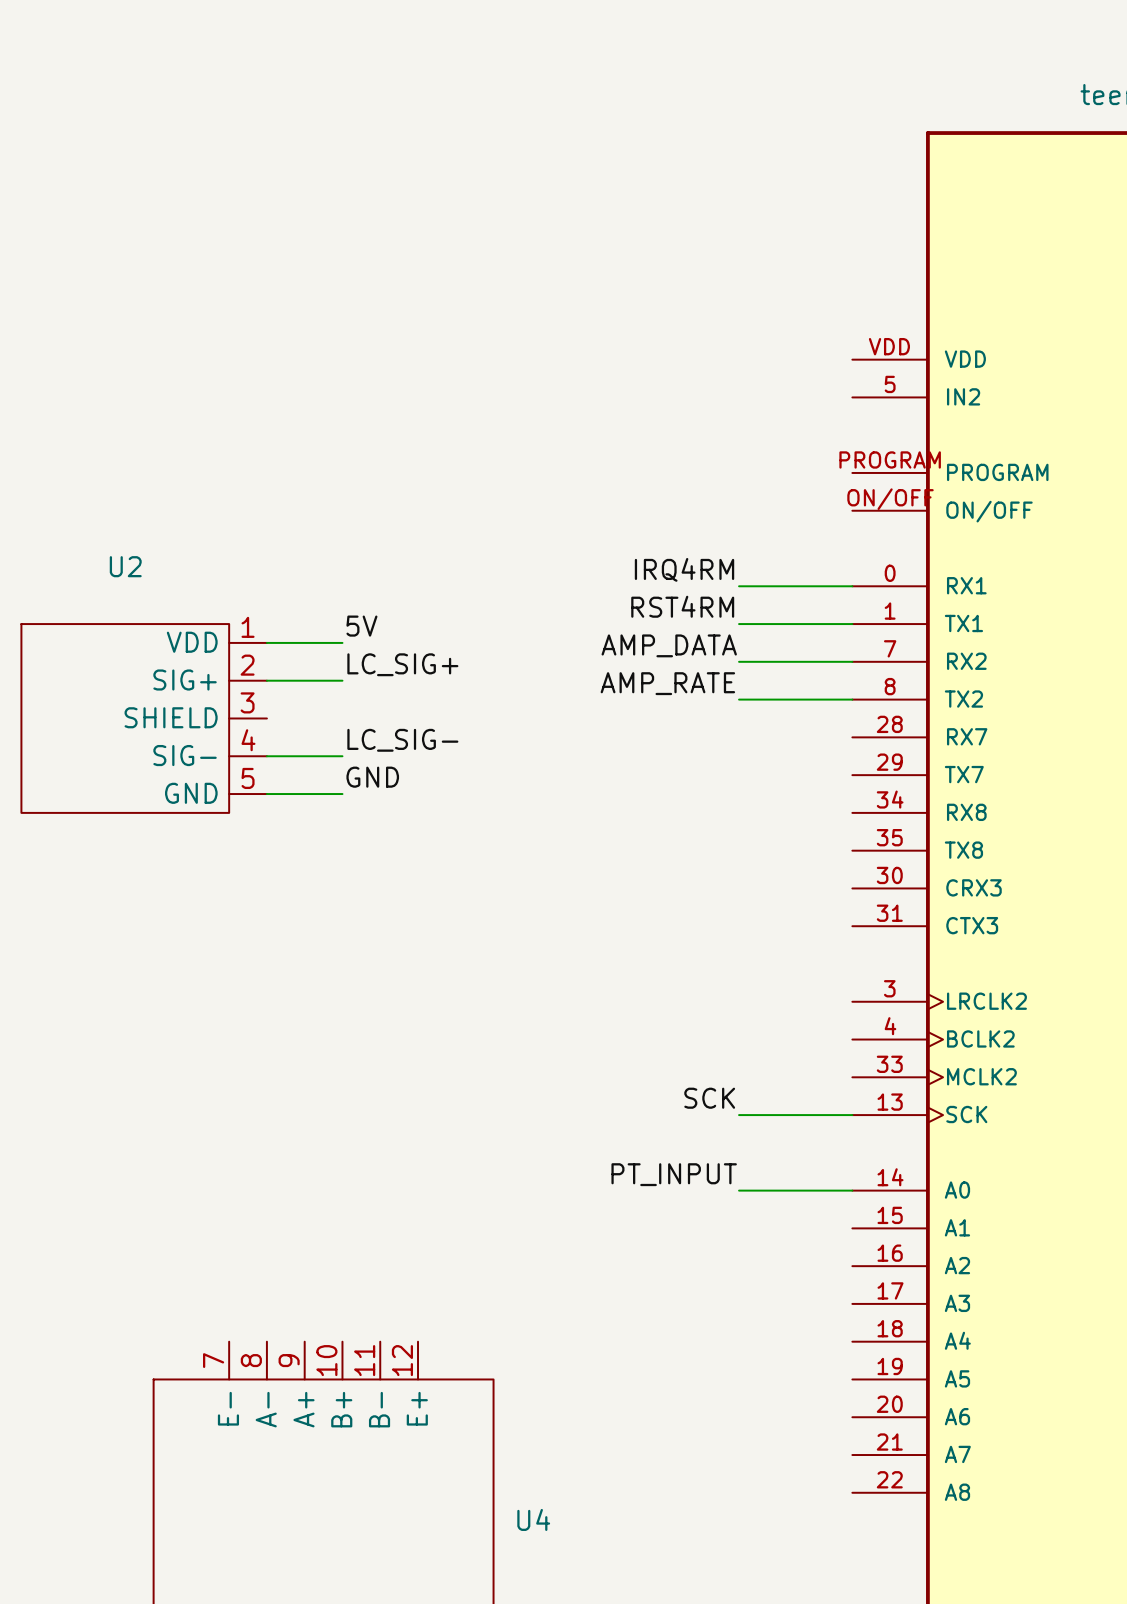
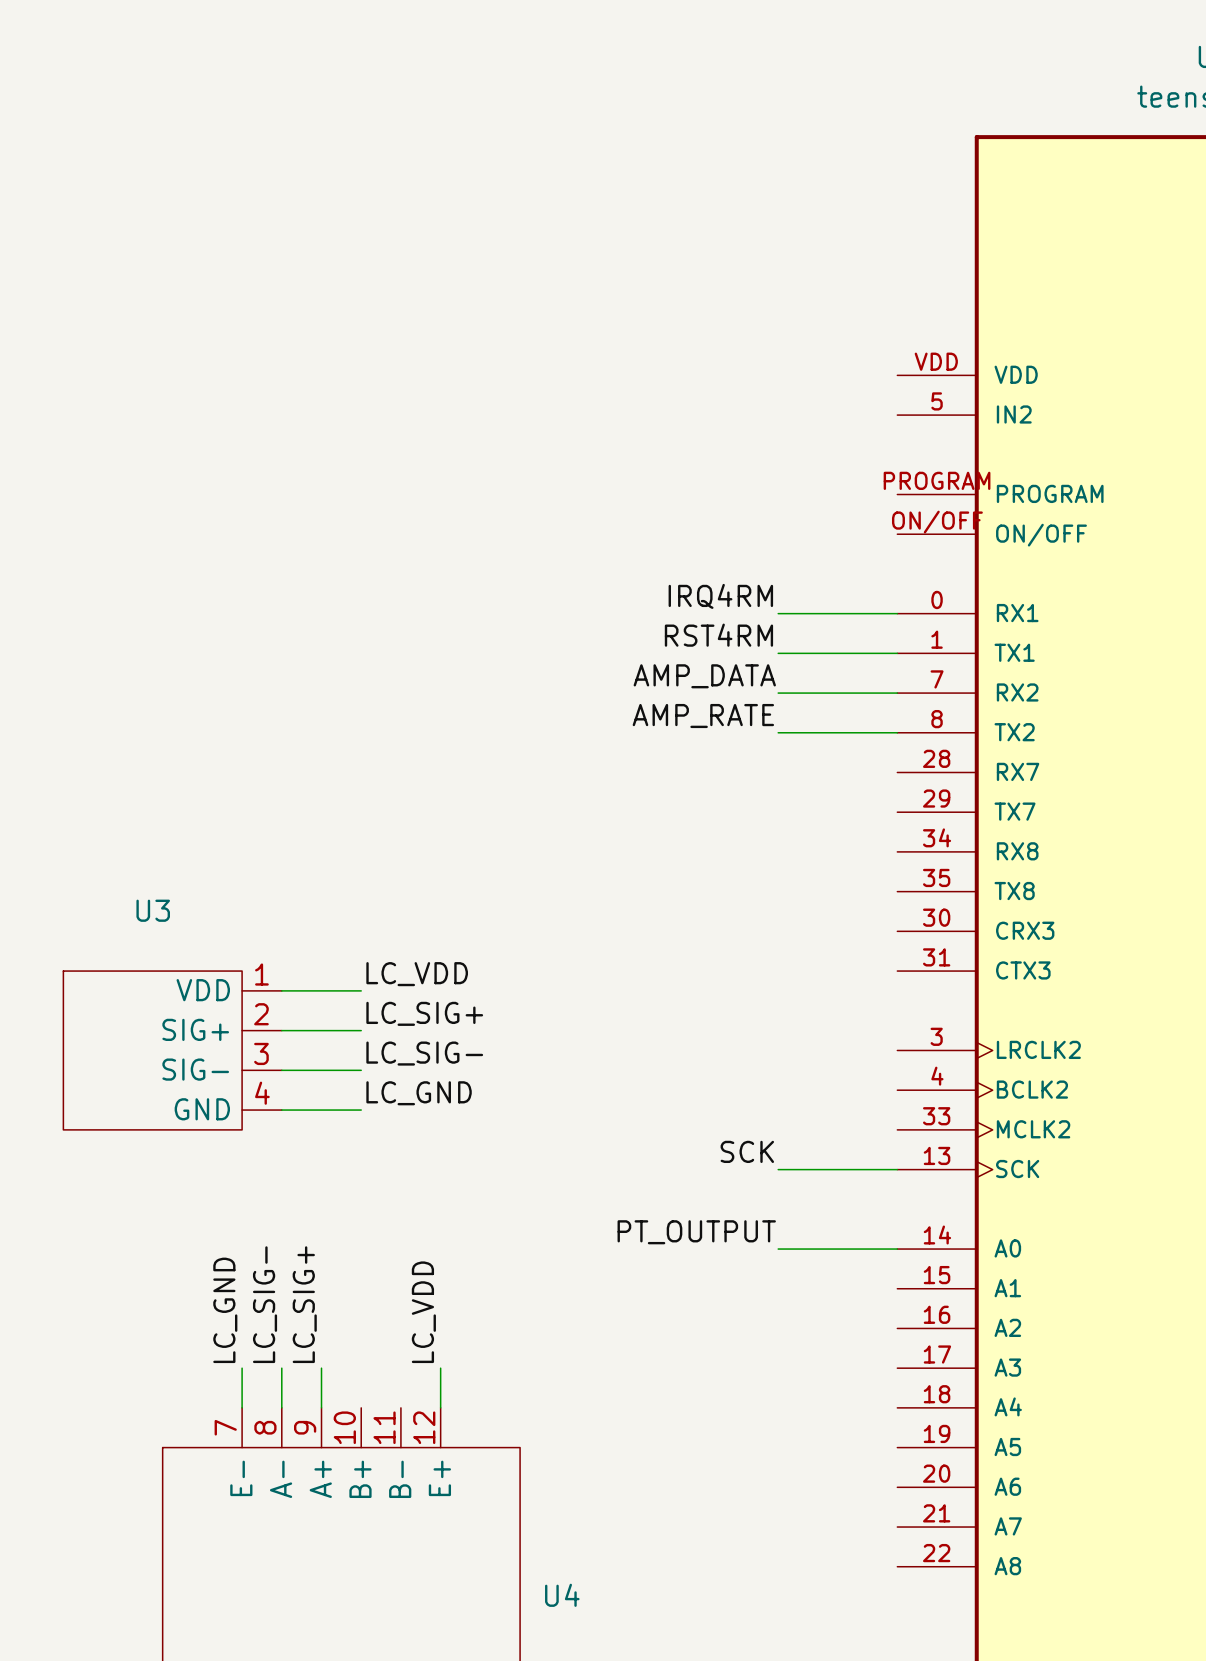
label: 5V (361, 626) -> none
wire: (266, 642) (342, 642) -> (281, 1030) (361, 1030)
label position: LC_SIG+ (402, 664) -> LC_SIG+ (424, 1013)
wire: (266, 680) (342, 680) -> (281, 990) (361, 990)
U2: (144, 718) -> none
label position: LC_SIG- (402, 740) -> LC_SIG- (424, 1053)
wire: (266, 756) (342, 756) -> (281, 1070) (361, 1070)
label: GND (372, 777) -> none
wire: (266, 794) (342, 794) -> (281, 1110) (361, 1110)
label: none -> LC_VDD (417, 974)
U3: none -> (172, 1050)
label: none -> LC_GND (419, 1093)
label: PT_INPUT (674, 1174) -> PT_OUTPUT (696, 1232)
label: none -> LC_SIG- (265, 1304)
label: none -> LC_SIG+ (304, 1304)
label: none -> LC_GND (225, 1310)
label: none -> LC_VDD (423, 1312)
wire: none -> (242, 1368) (242, 1407)
wire: none -> (281, 1368) (281, 1407)
wire: none -> (321, 1368) (321, 1407)
wire: none -> (440, 1368) (440, 1407)

